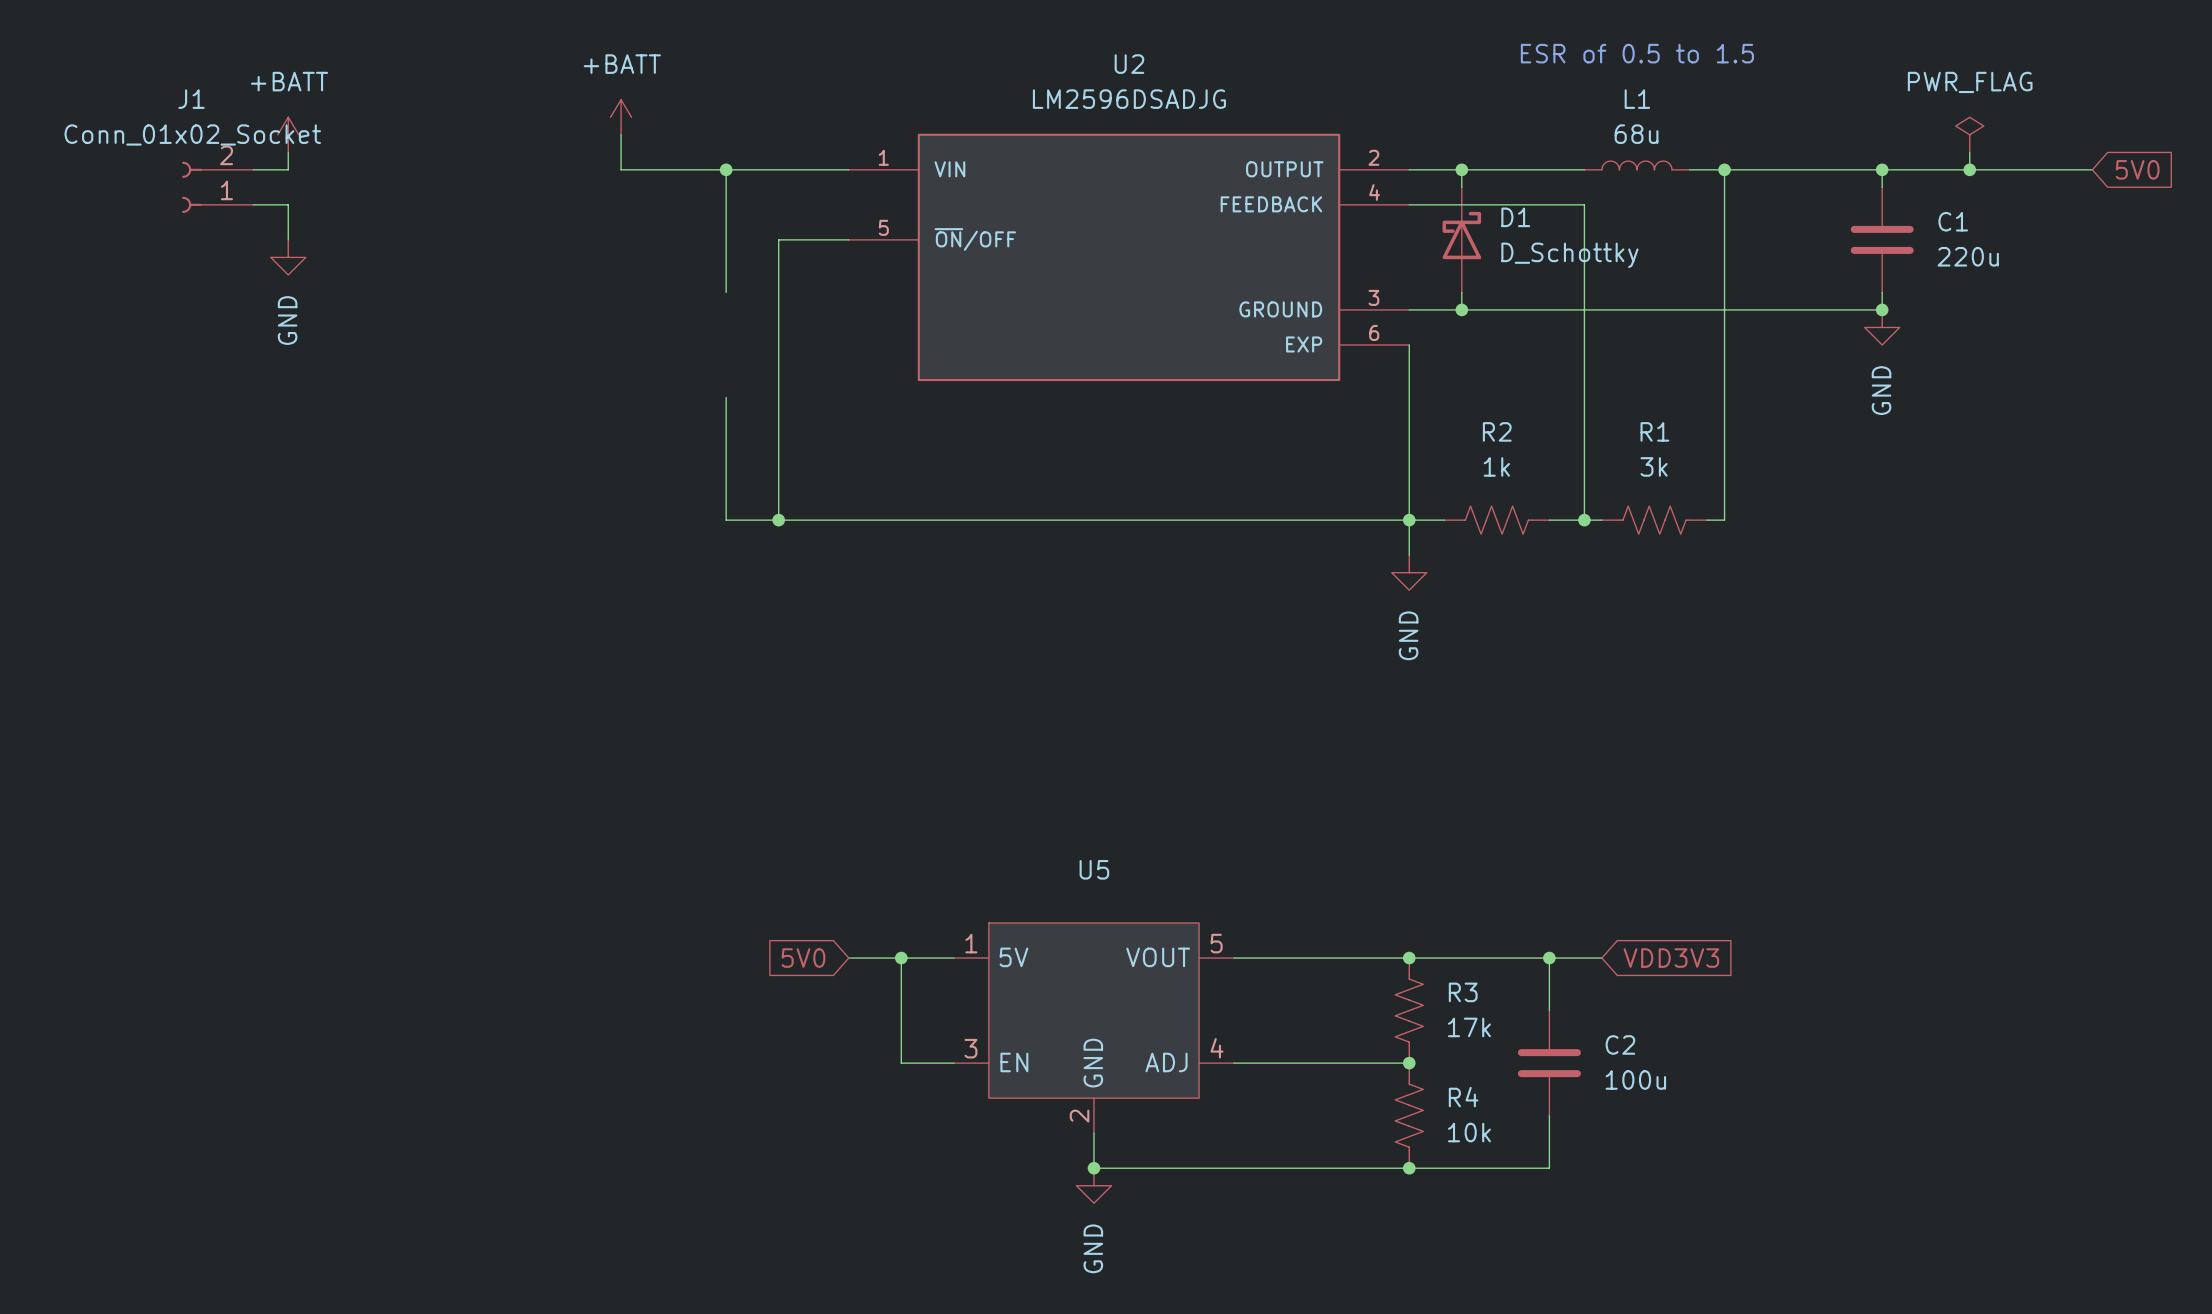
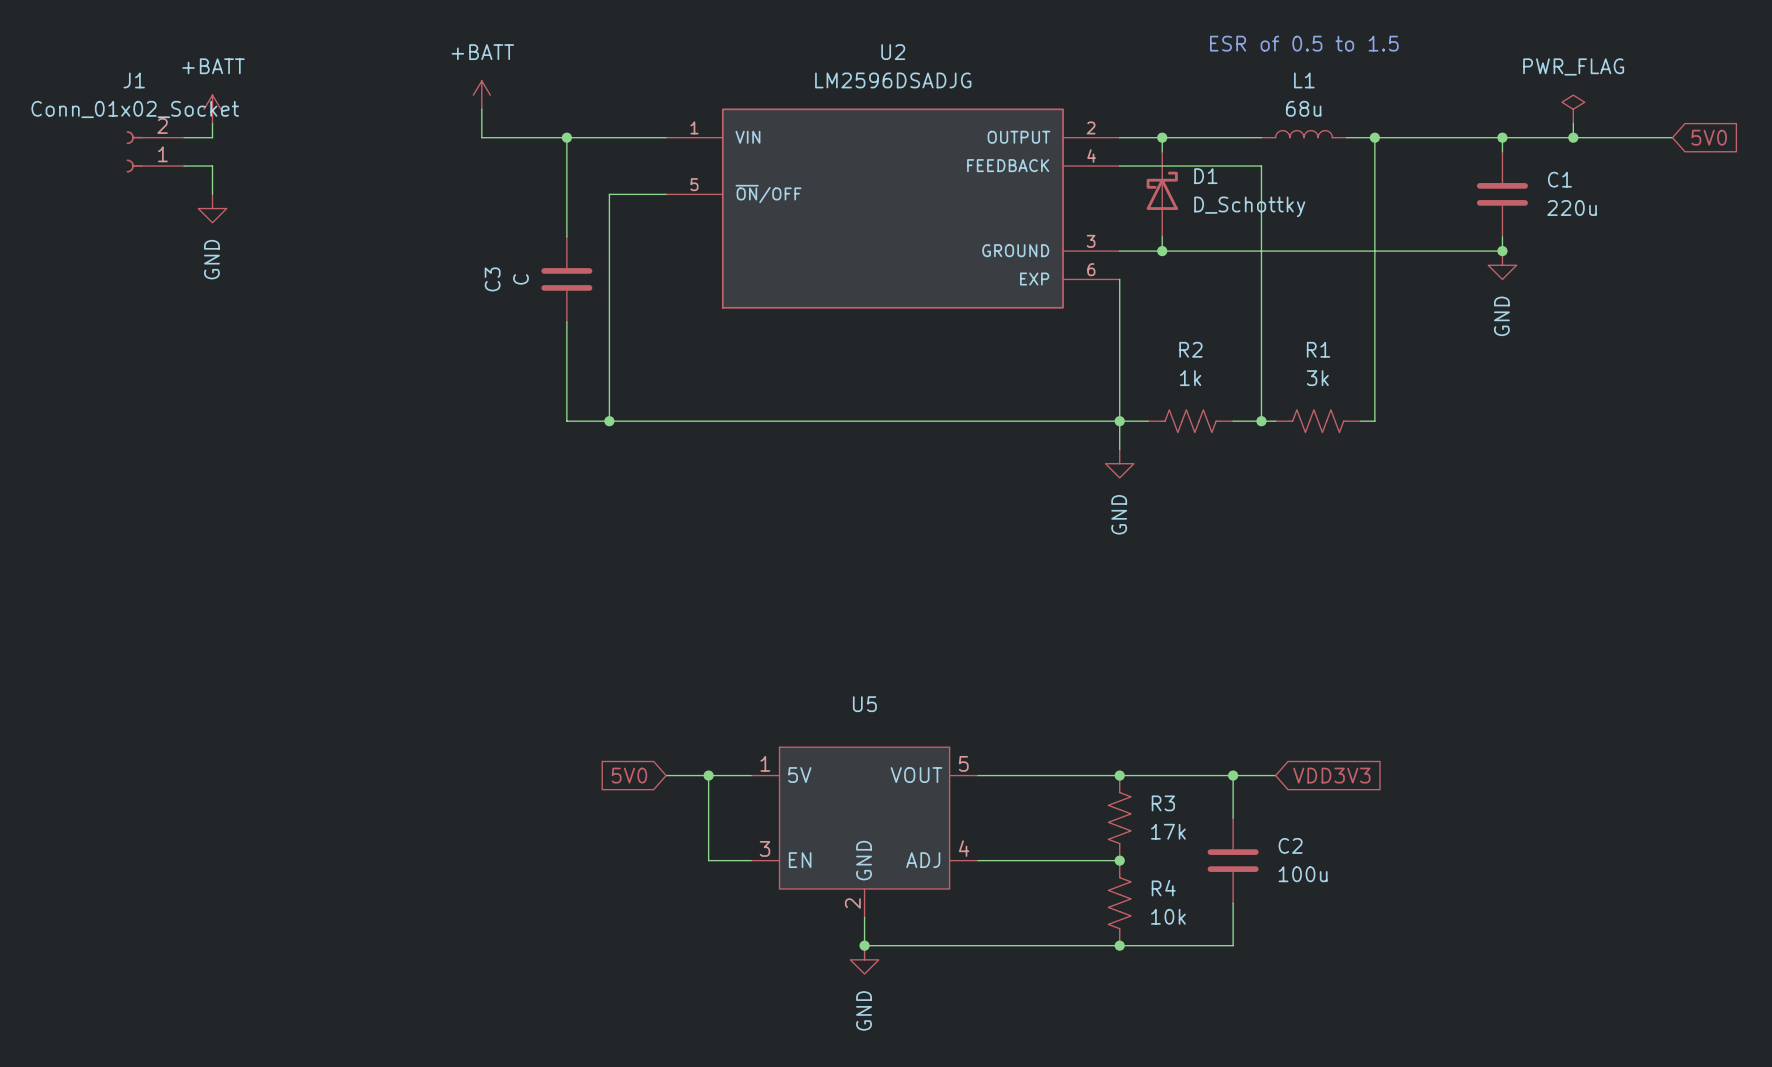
C3: none -> C (566, 279)

